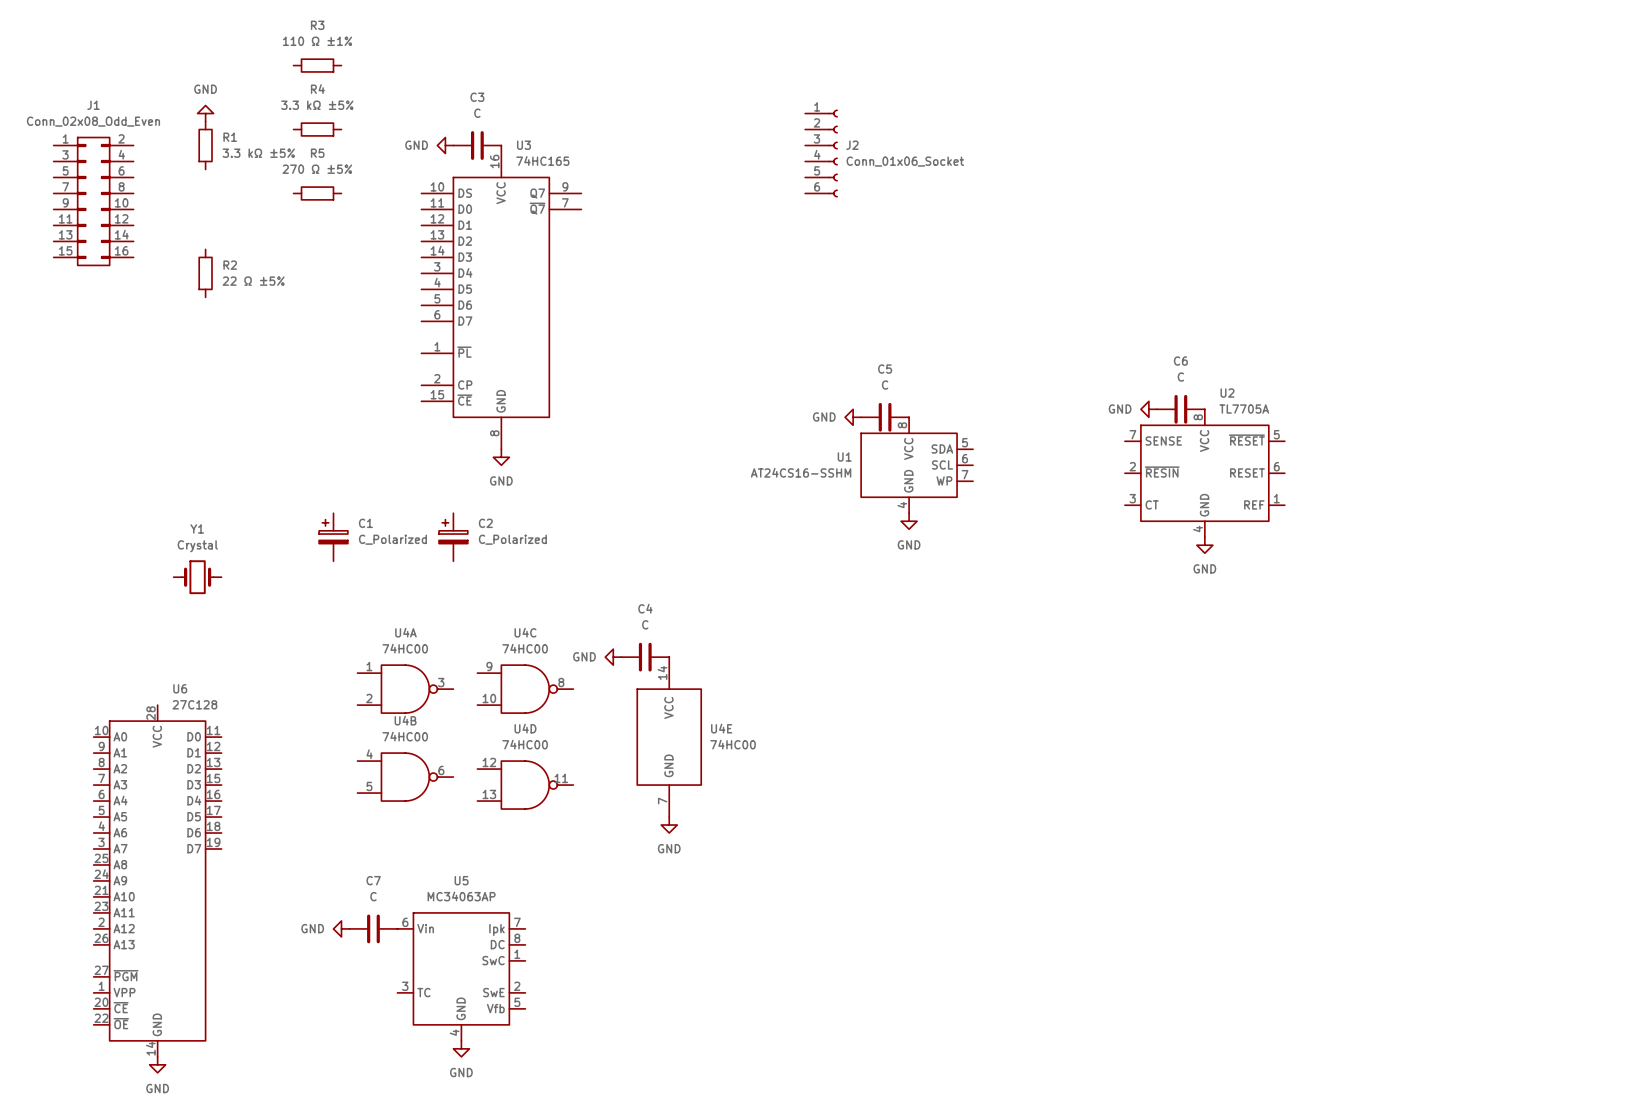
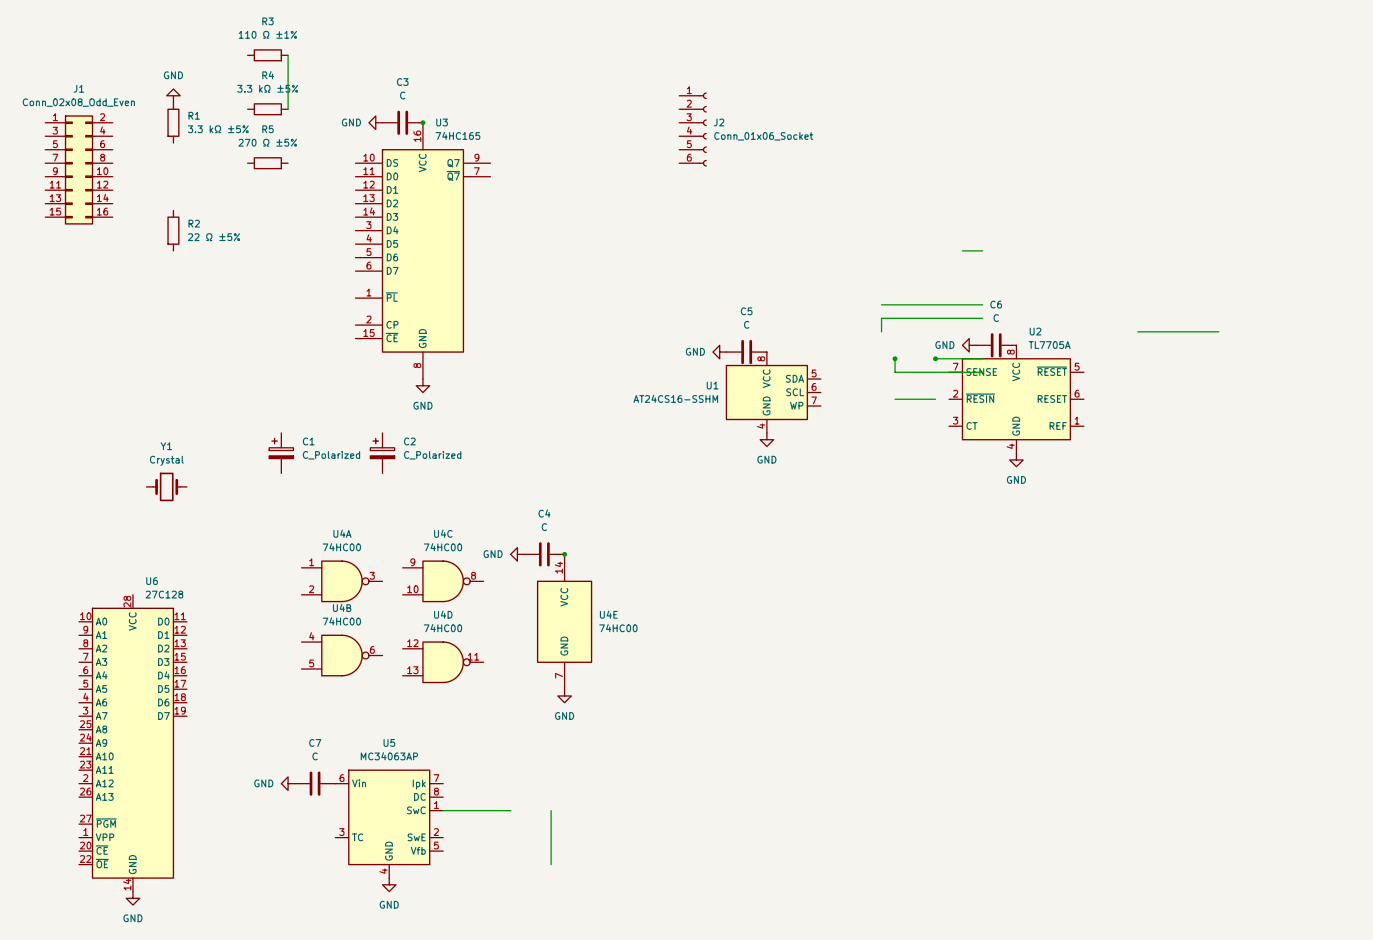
wire: none -> (288, 55) (288, 109)
junction: none -> (422, 122)
wire: none -> (962, 250) (982, 250)
wire: none -> (881, 304) (982, 304)
wire: none -> (982, 318) (881, 318) (881, 331)
wire: none -> (1137, 331) (1218, 331)
wire: none -> (895, 358) (895, 372) (982, 372)
junction: none -> (895, 358)
wire: none -> (935, 358) (982, 358)
junction: none -> (935, 358)
wire: none -> (895, 399) (935, 399)
junction: none -> (564, 554)
wire: none -> (443, 810) (510, 810)
wire: none -> (551, 810) (551, 864)

